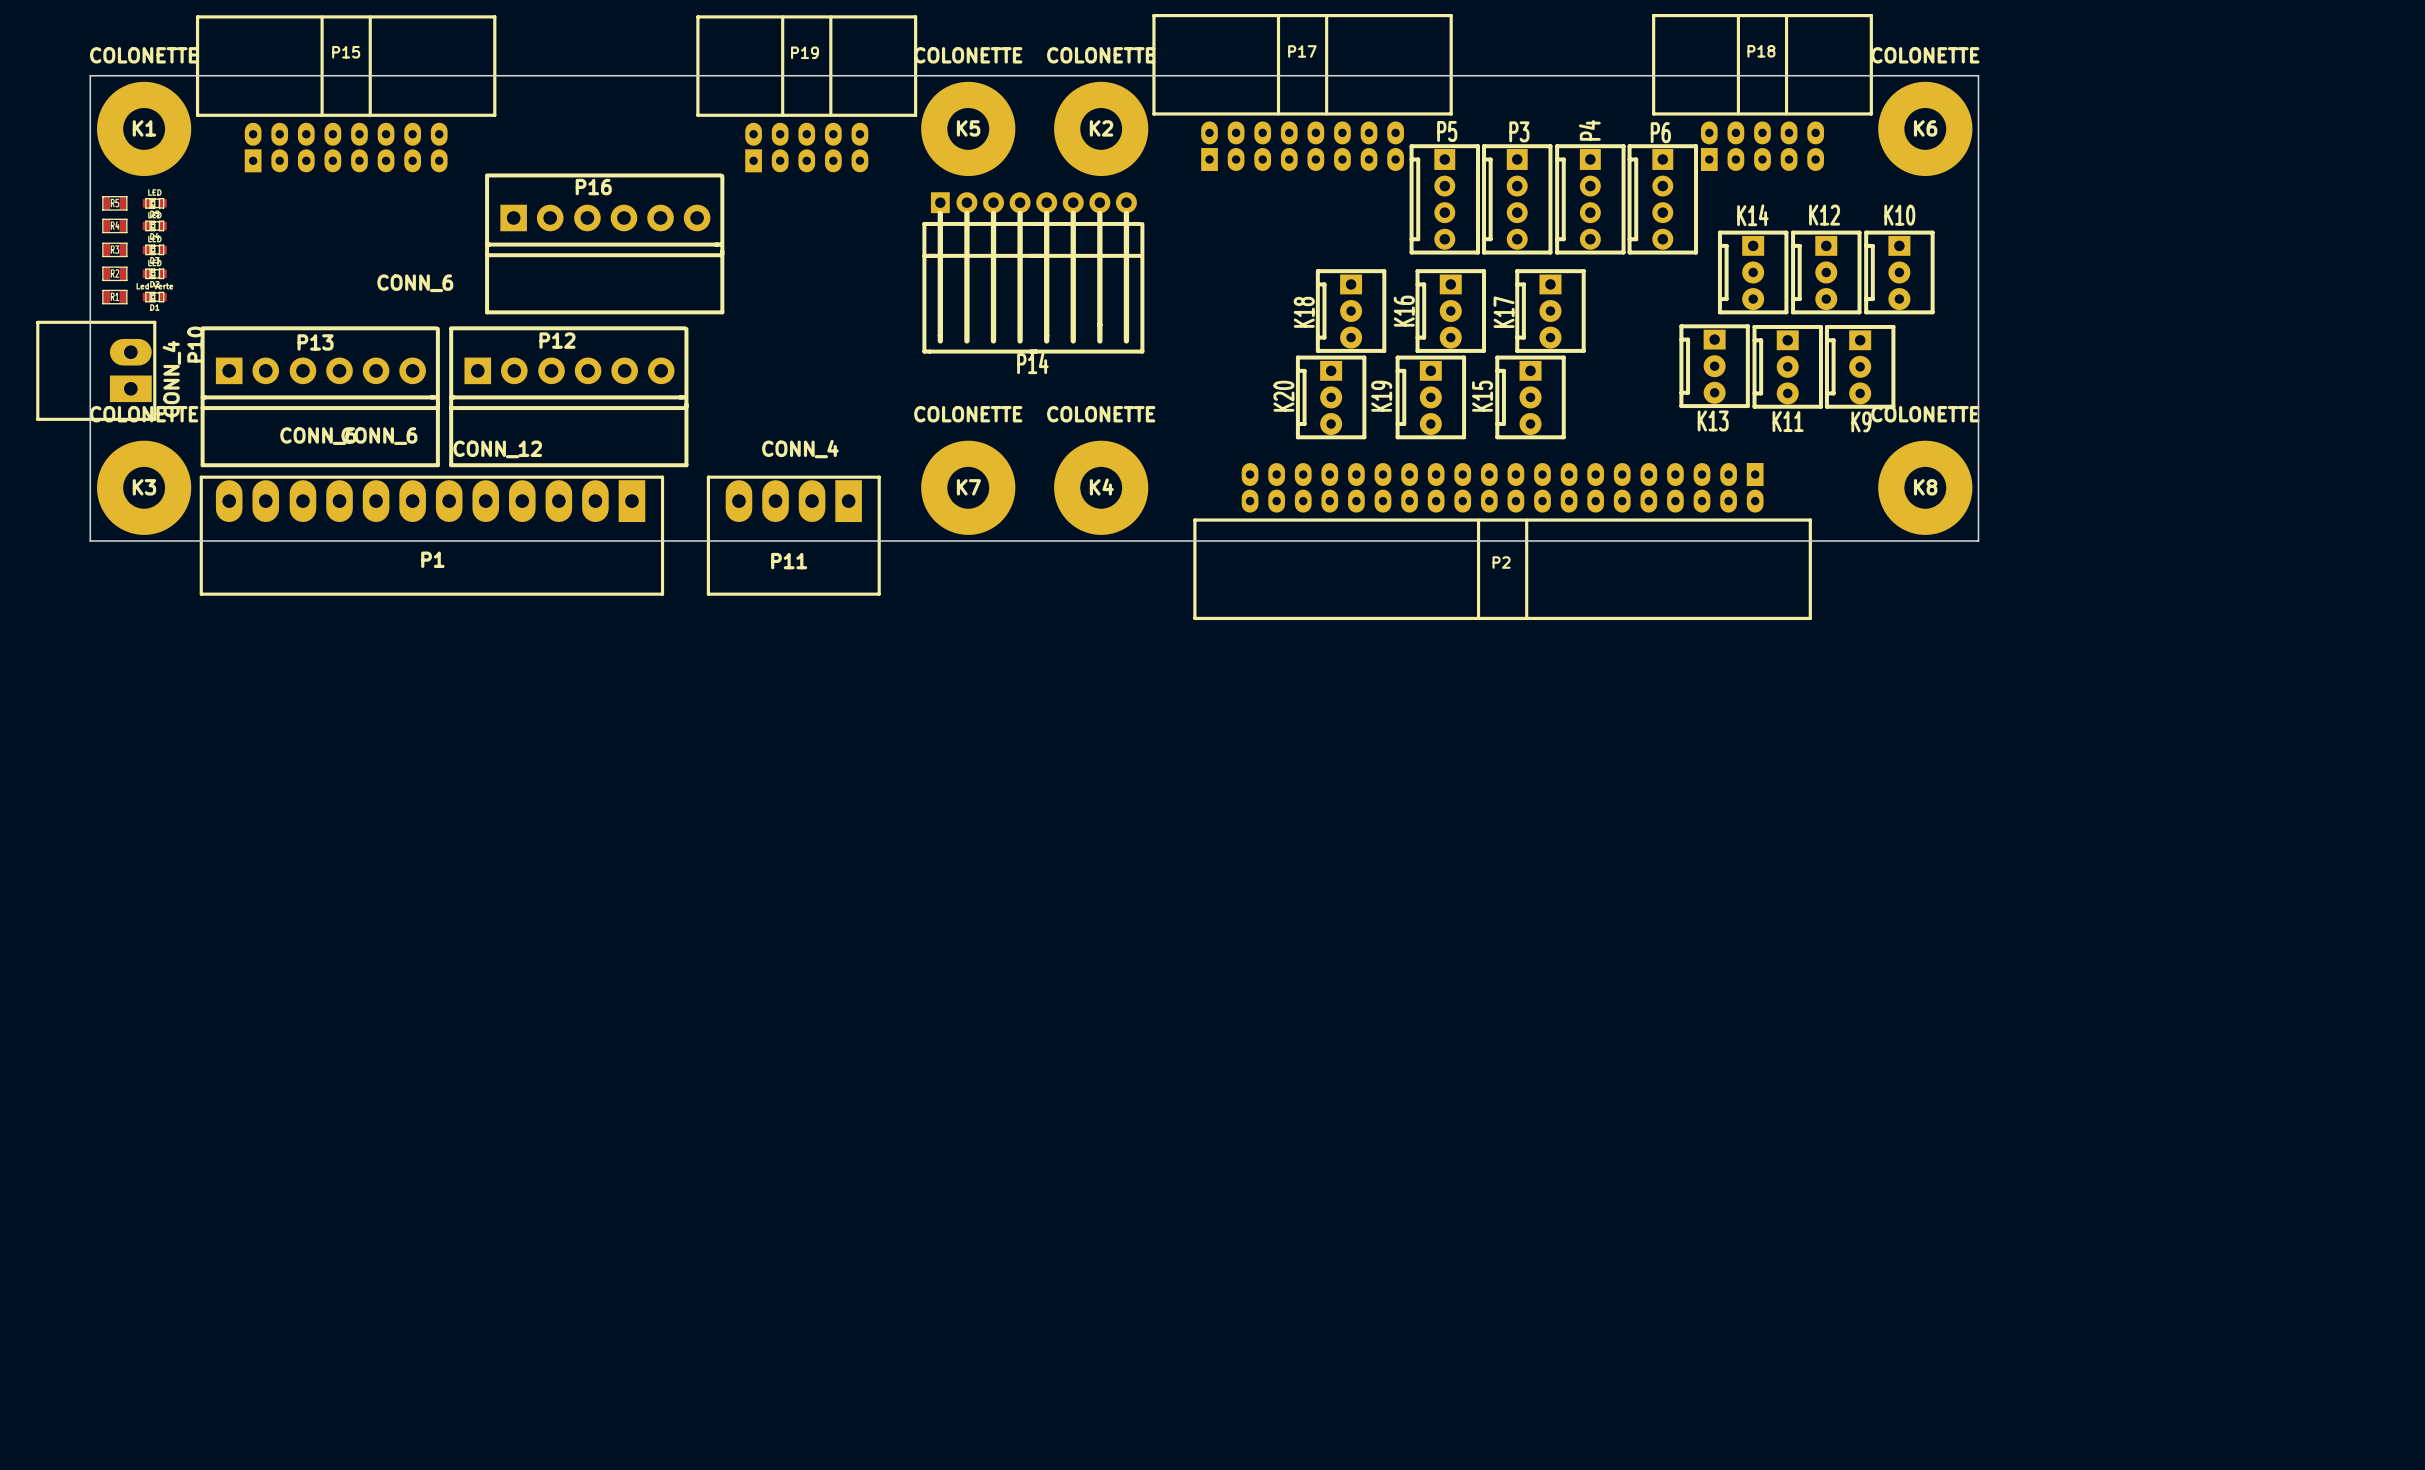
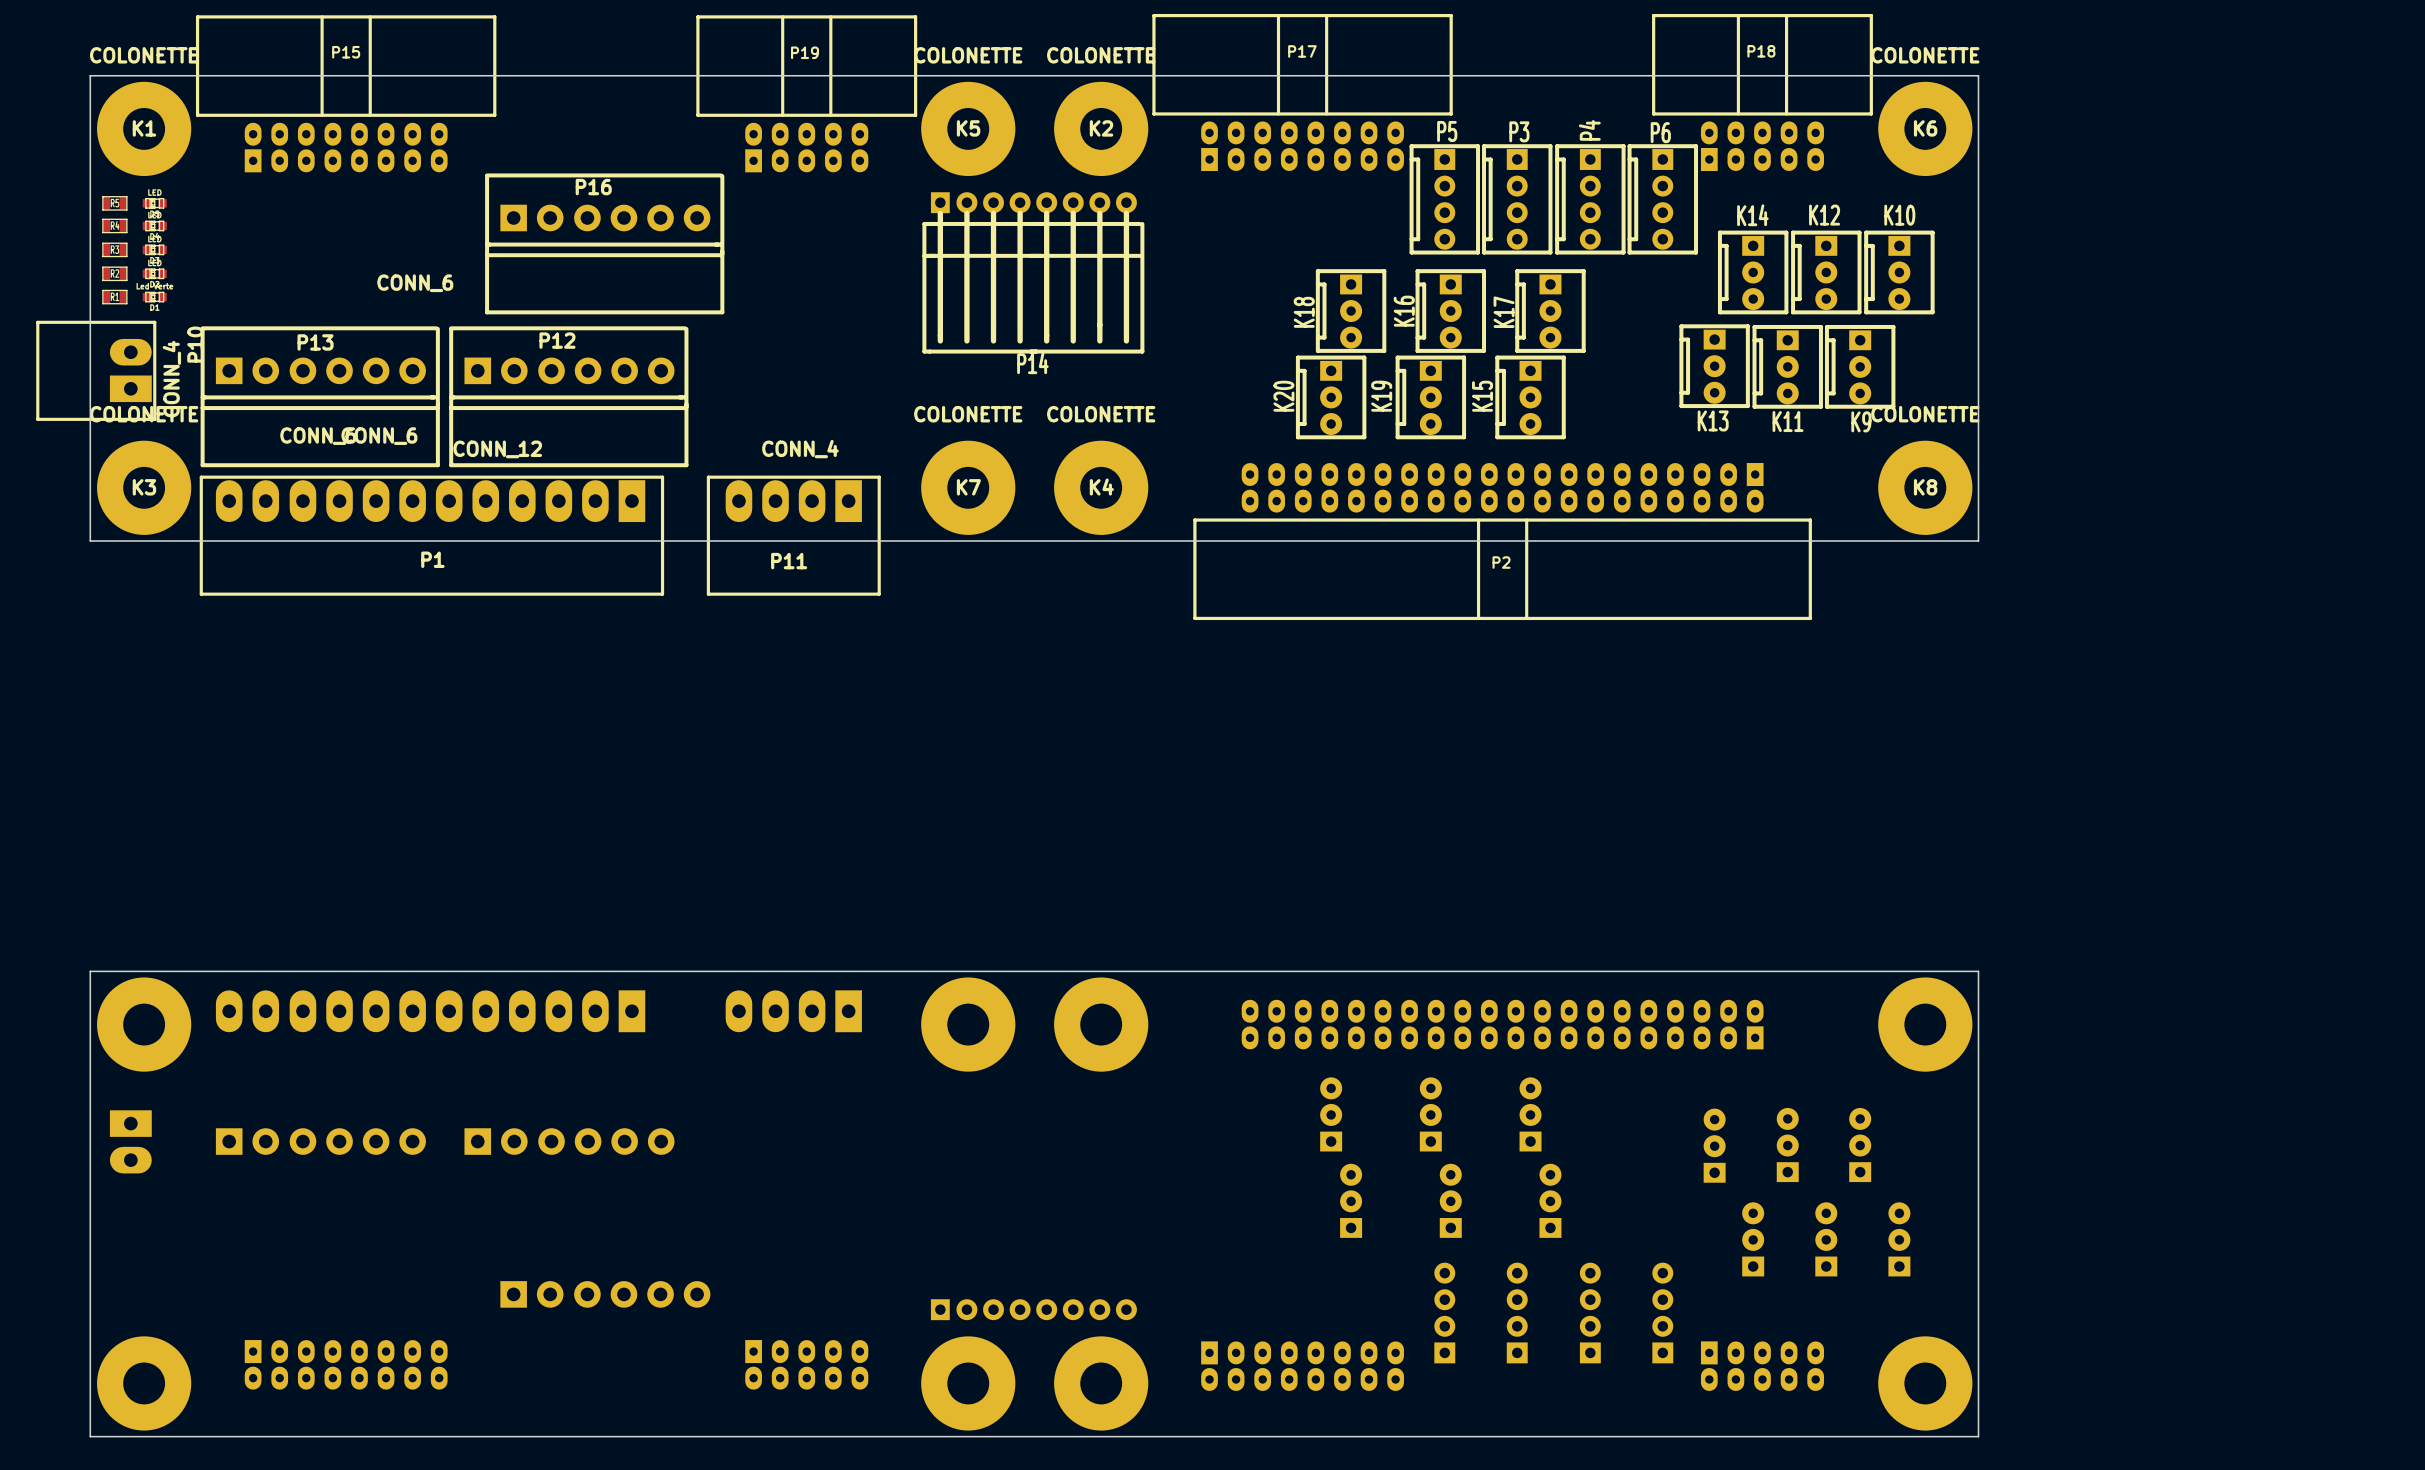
board edge: none -> (90, 971) (1978, 971) (1978, 1436) (90, 1436) (90, 971)
part: none -> (430, 1011)
part: none -> (793, 1011)
part: none -> (144, 1024)
part: none -> (968, 1024)
part: none -> (1101, 1024)
part: none -> (1502, 1024)
part: none -> (1925, 1024)
part: none -> (1331, 1114)
part: none -> (1430, 1114)
part: none -> (1530, 1114)
part: none -> (130, 1141)
part: none -> (320, 1141)
part: none -> (569, 1141)
part: none -> (1714, 1145)
part: none -> (1787, 1145)
part: none -> (1860, 1145)
part: none -> (1351, 1200)
part: none -> (1450, 1200)
part: none -> (1550, 1200)
part: none -> (1753, 1239)
part: none -> (1826, 1239)
part: none -> (1899, 1239)
part: none -> (605, 1294)
part: none -> (1033, 1309)
part: none -> (1444, 1313)
part: none -> (1517, 1313)
part: none -> (1590, 1313)
part: none -> (1662, 1313)
part: none -> (346, 1364)
part: none -> (806, 1364)
part: none -> (1302, 1366)
part: none -> (1762, 1366)
part: none -> (144, 1383)
part: none -> (968, 1383)
part: none -> (1101, 1383)
part: none -> (1925, 1383)

